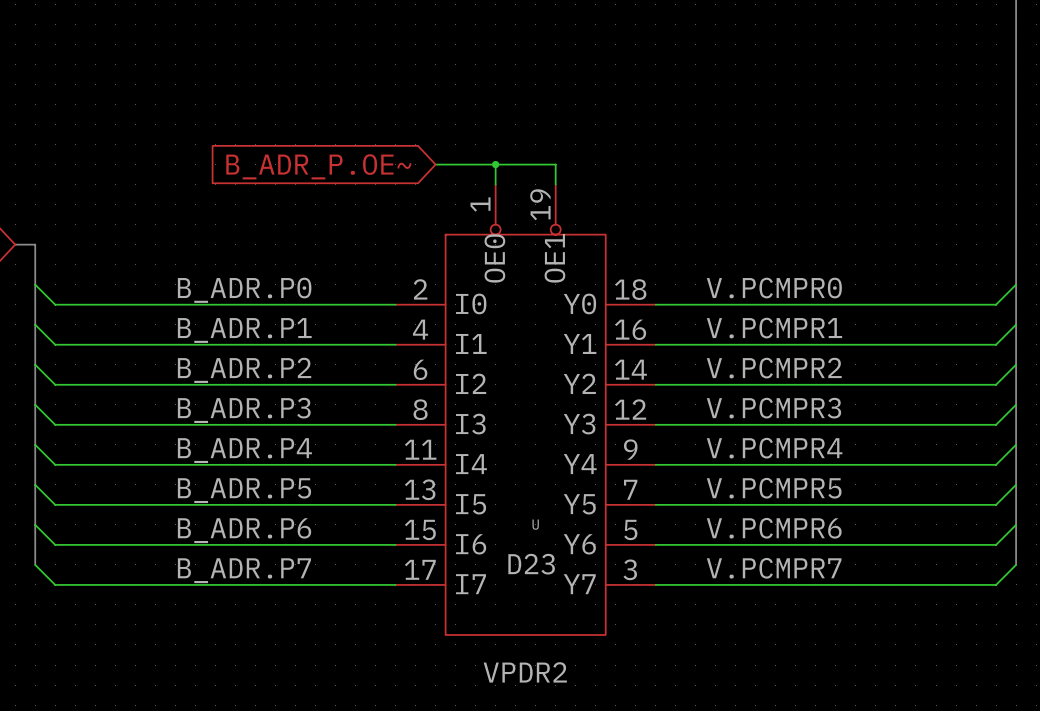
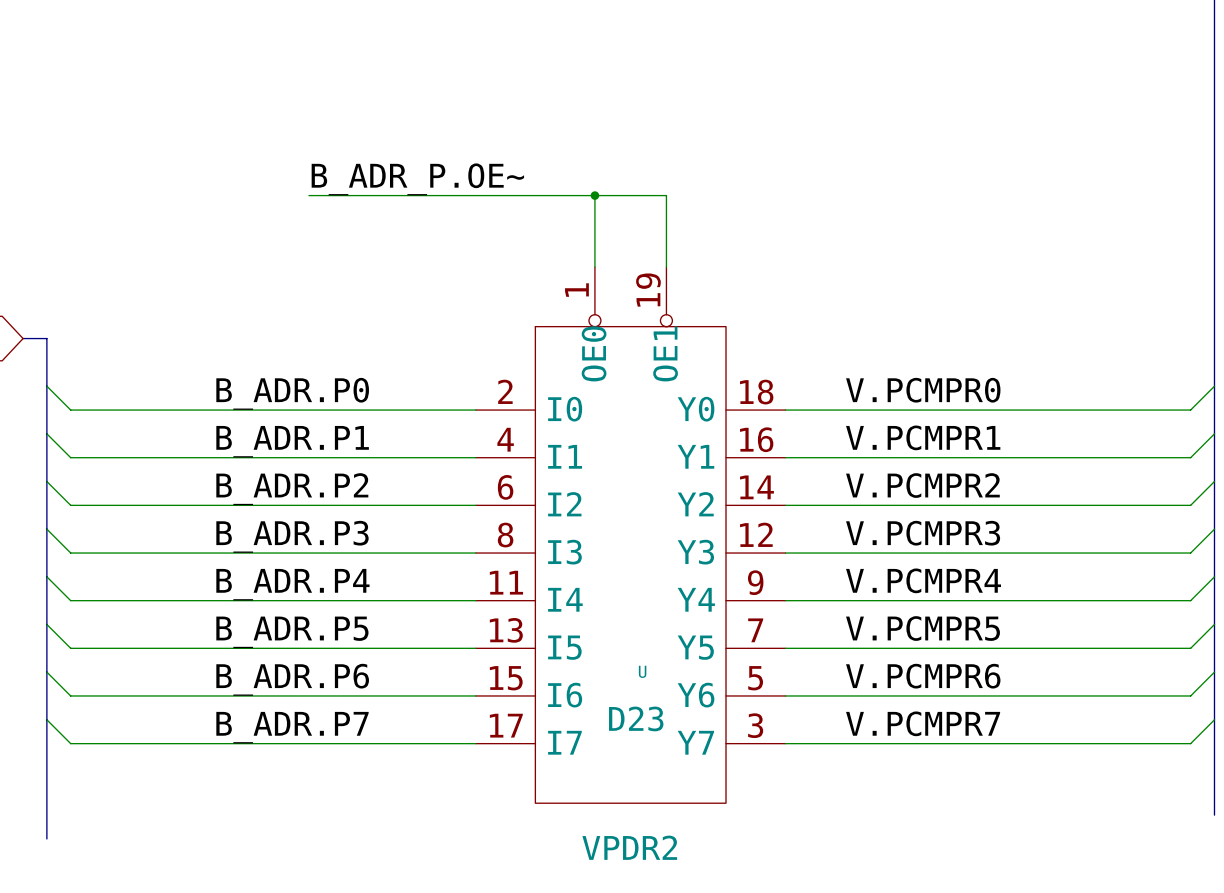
label: none -> B_ADR_P.OE~ (417, 179)
wire: none -> (594, 195) (594, 243)
wire: (435, 164) (555, 164) -> (309, 195) (666, 195) (666, 243)
junction position: (495, 164) -> (594, 195)
global label: B_ADR_P.OE~ (318, 166) -> none
bus: none -> (46, 719) (46, 838)
bus: none -> (1214, 719) (1214, 815)

